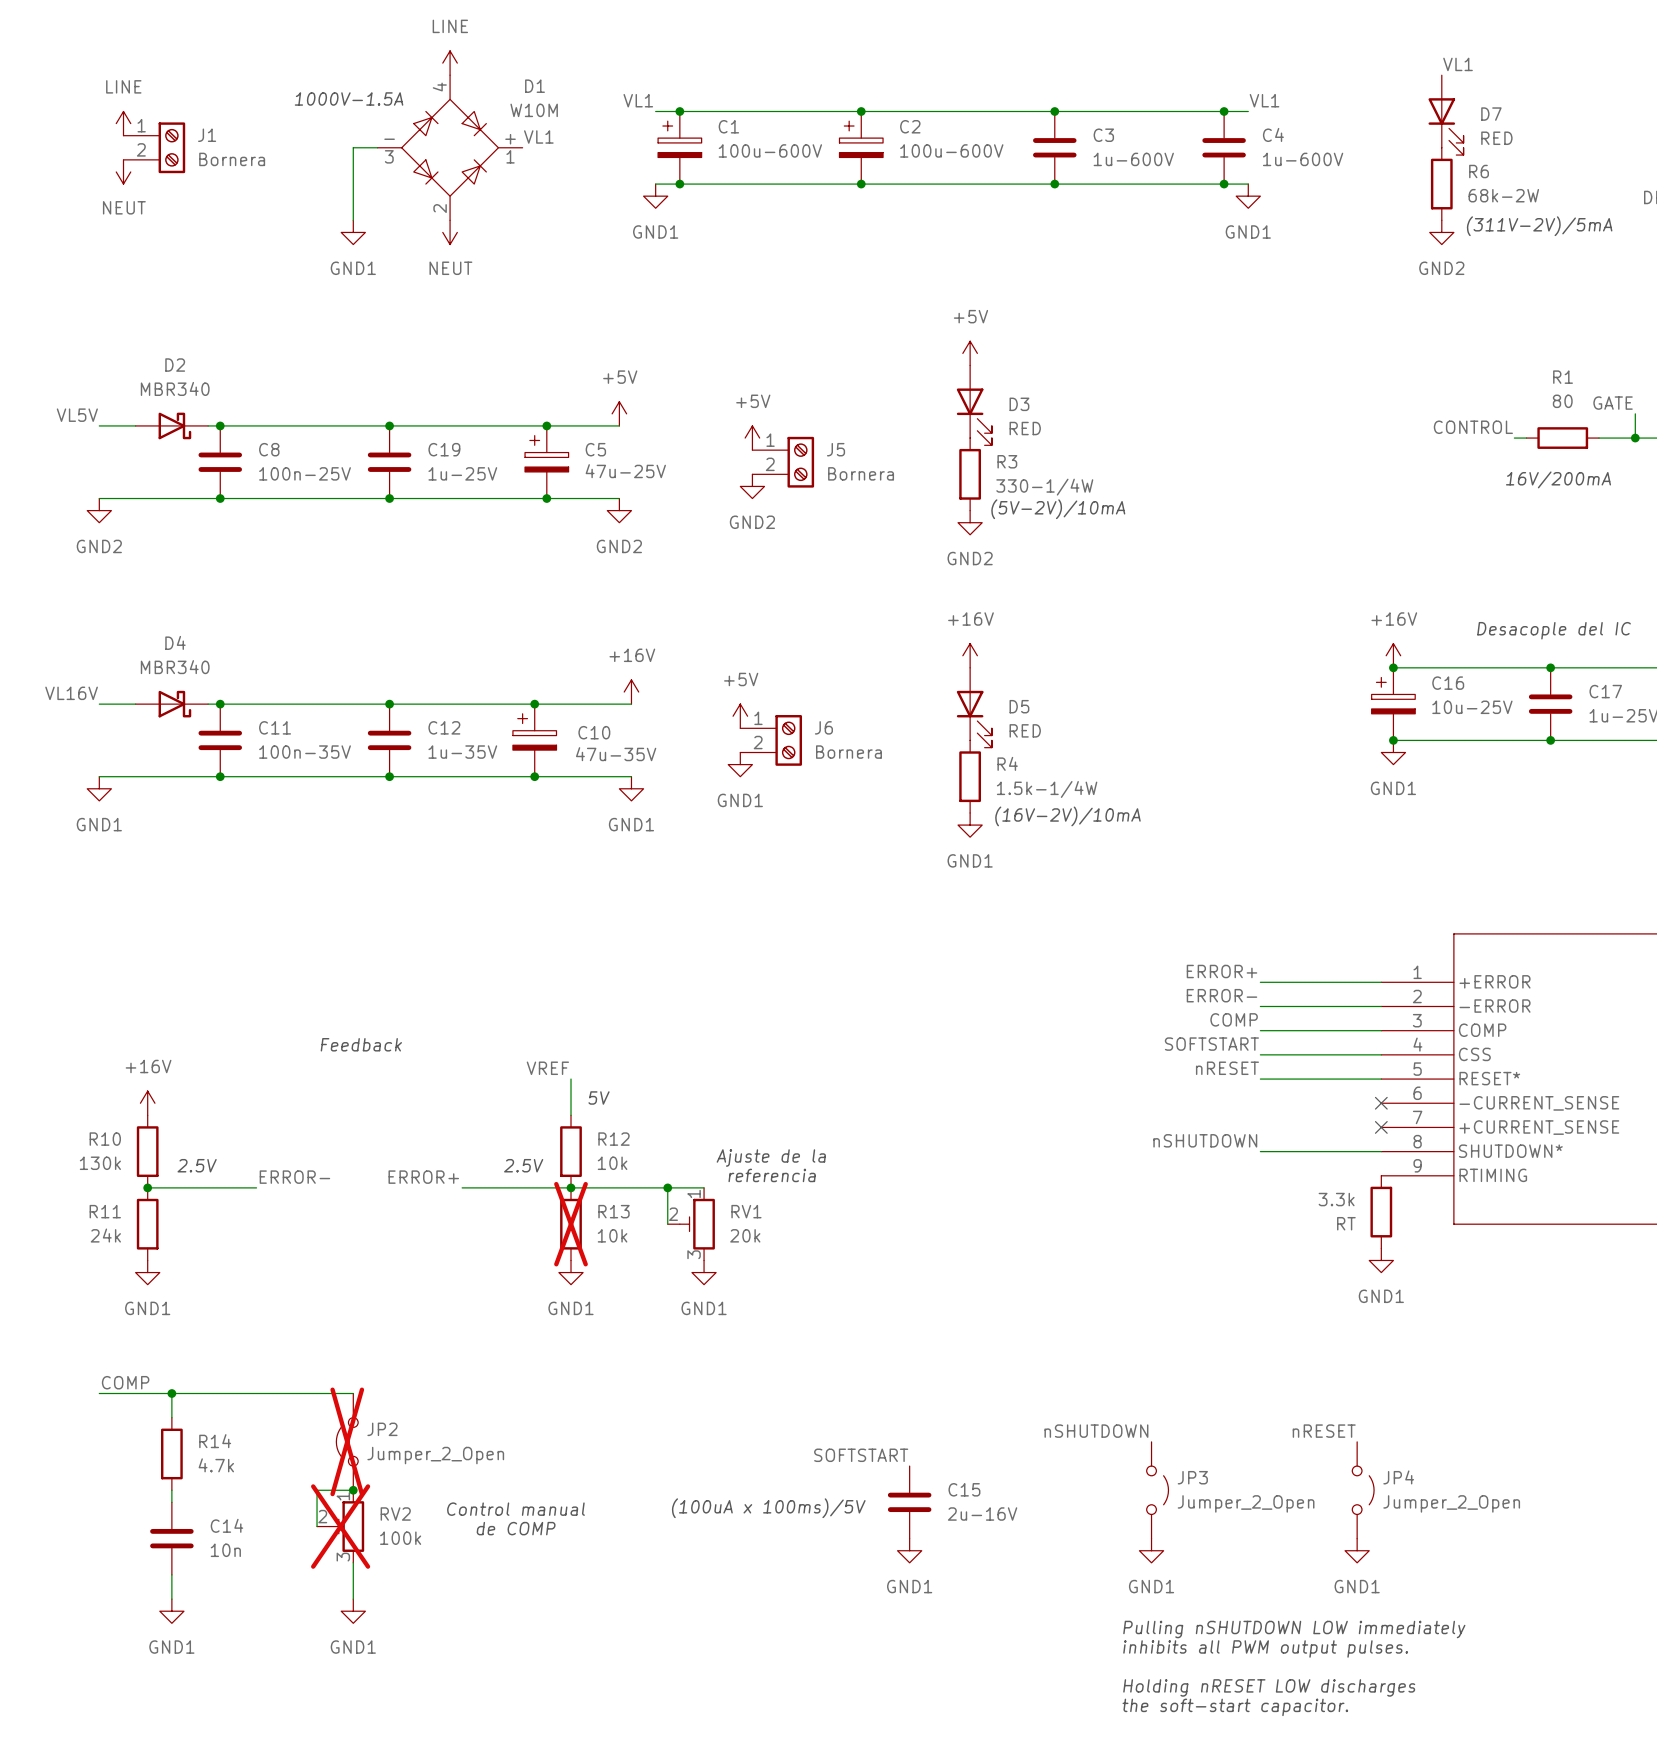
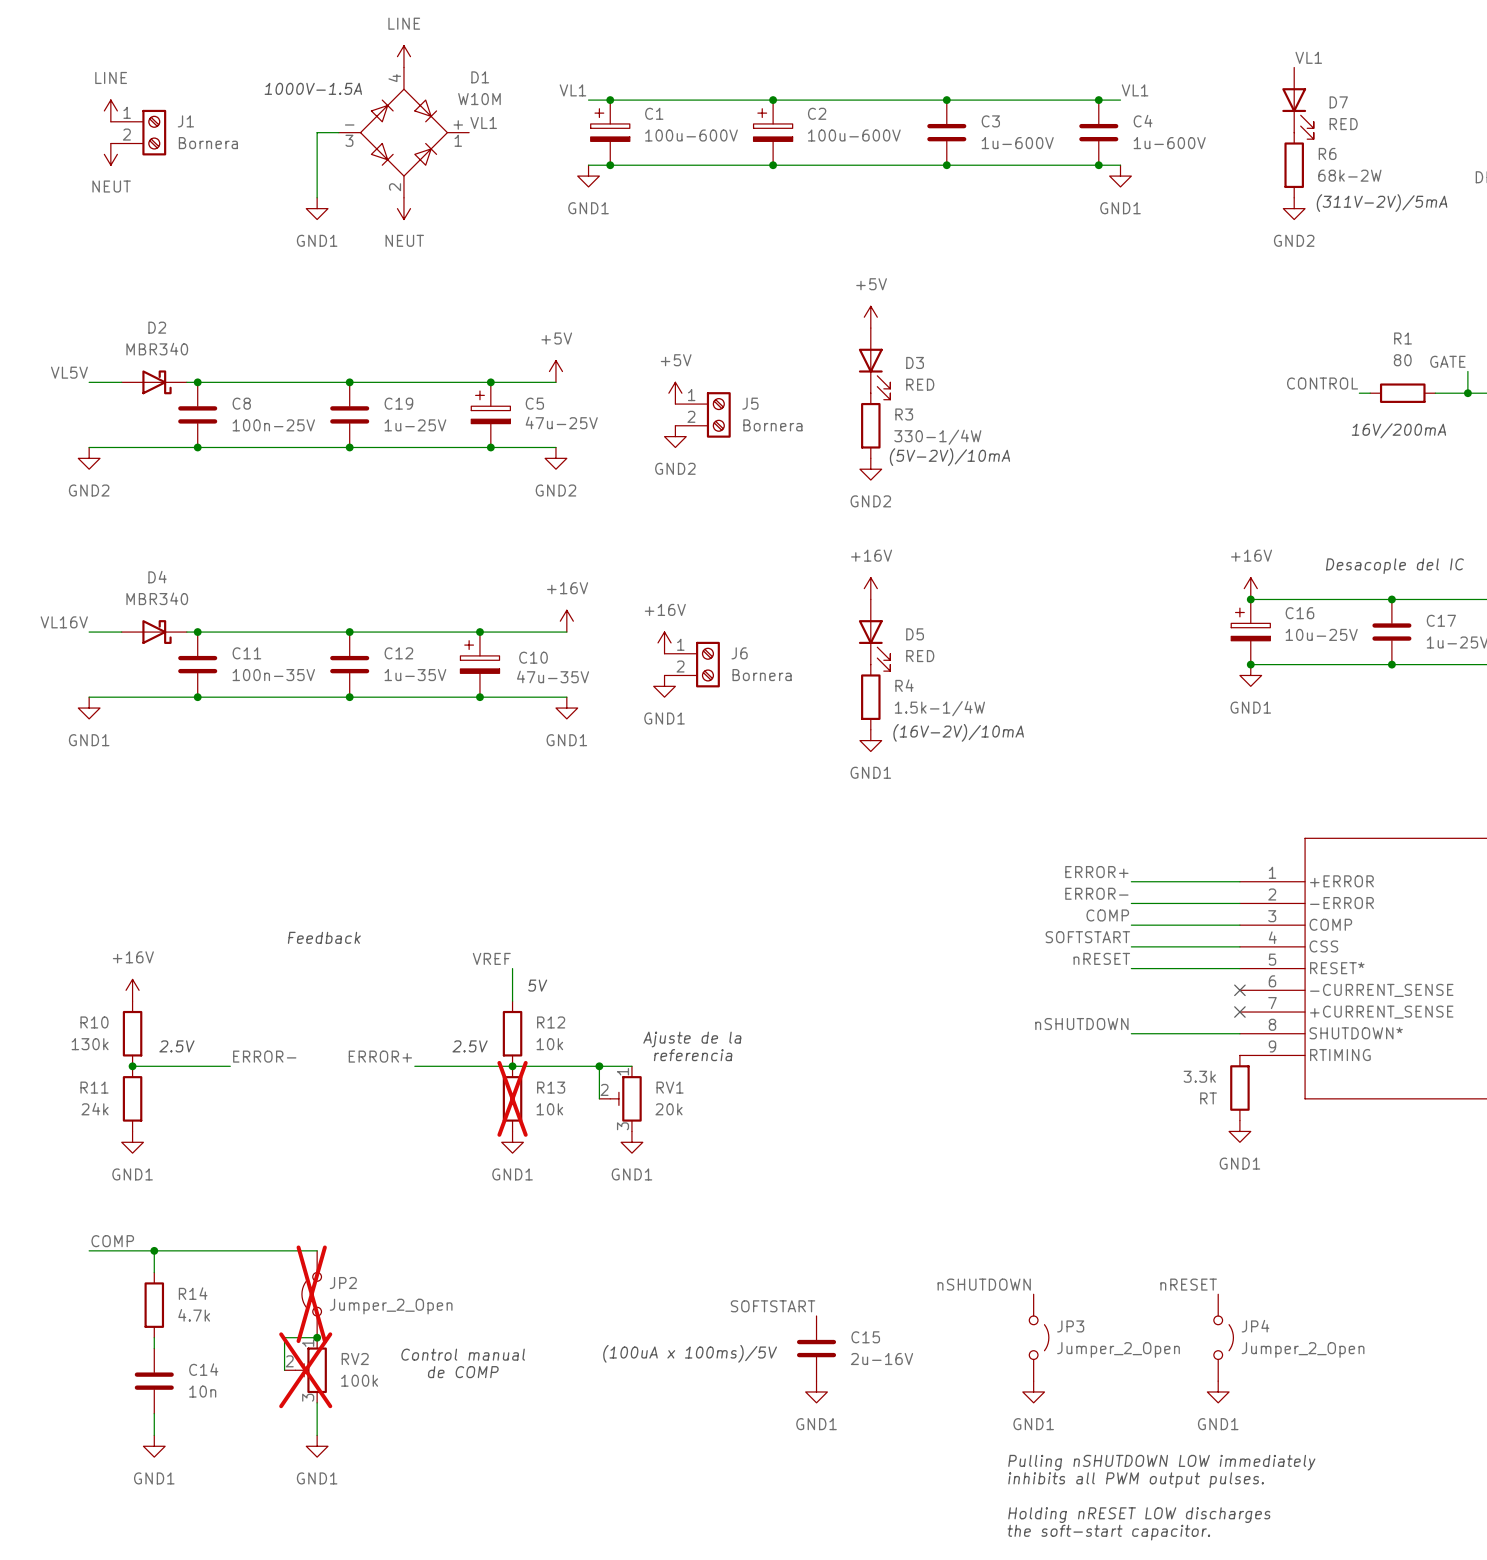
power symbol: +5V (740, 716) -> +16V (664, 642)

